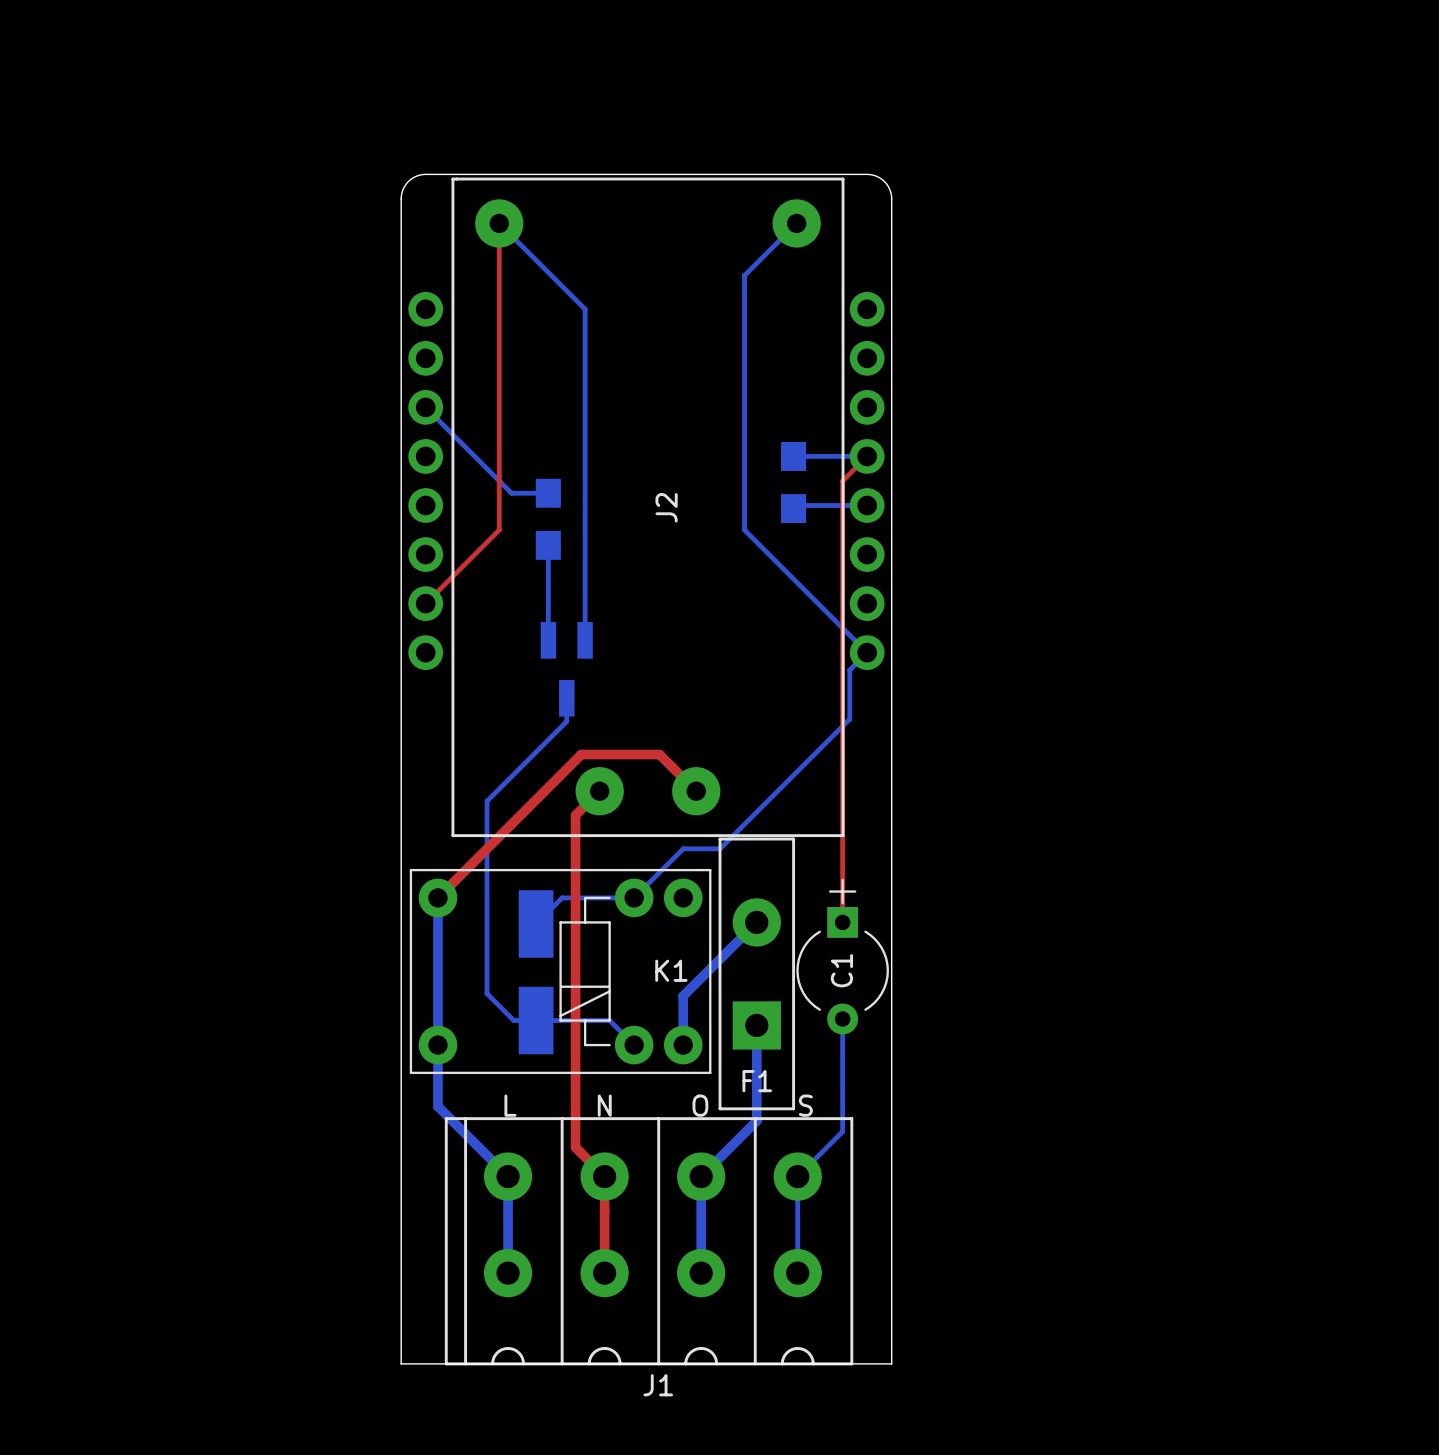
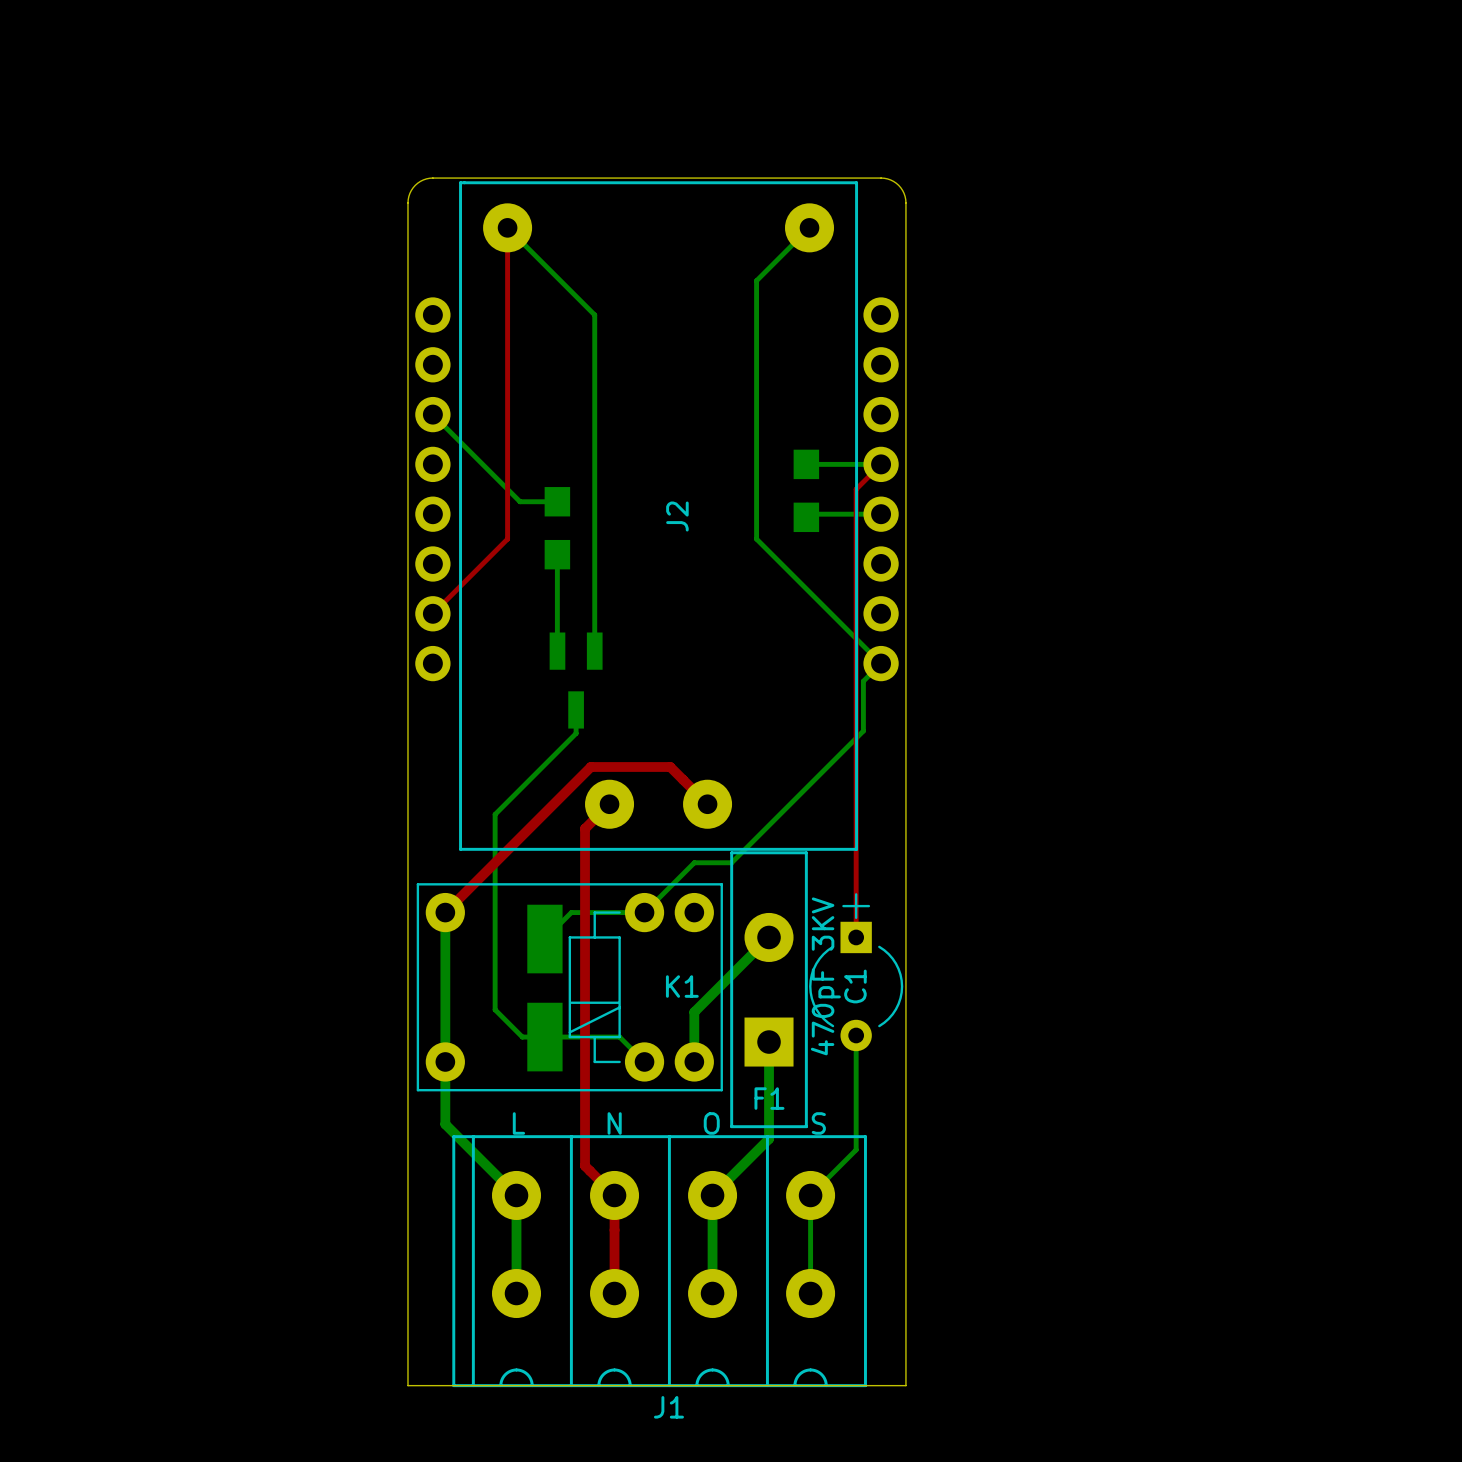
C1 value: none -> 470pF 3KV (825, 976)

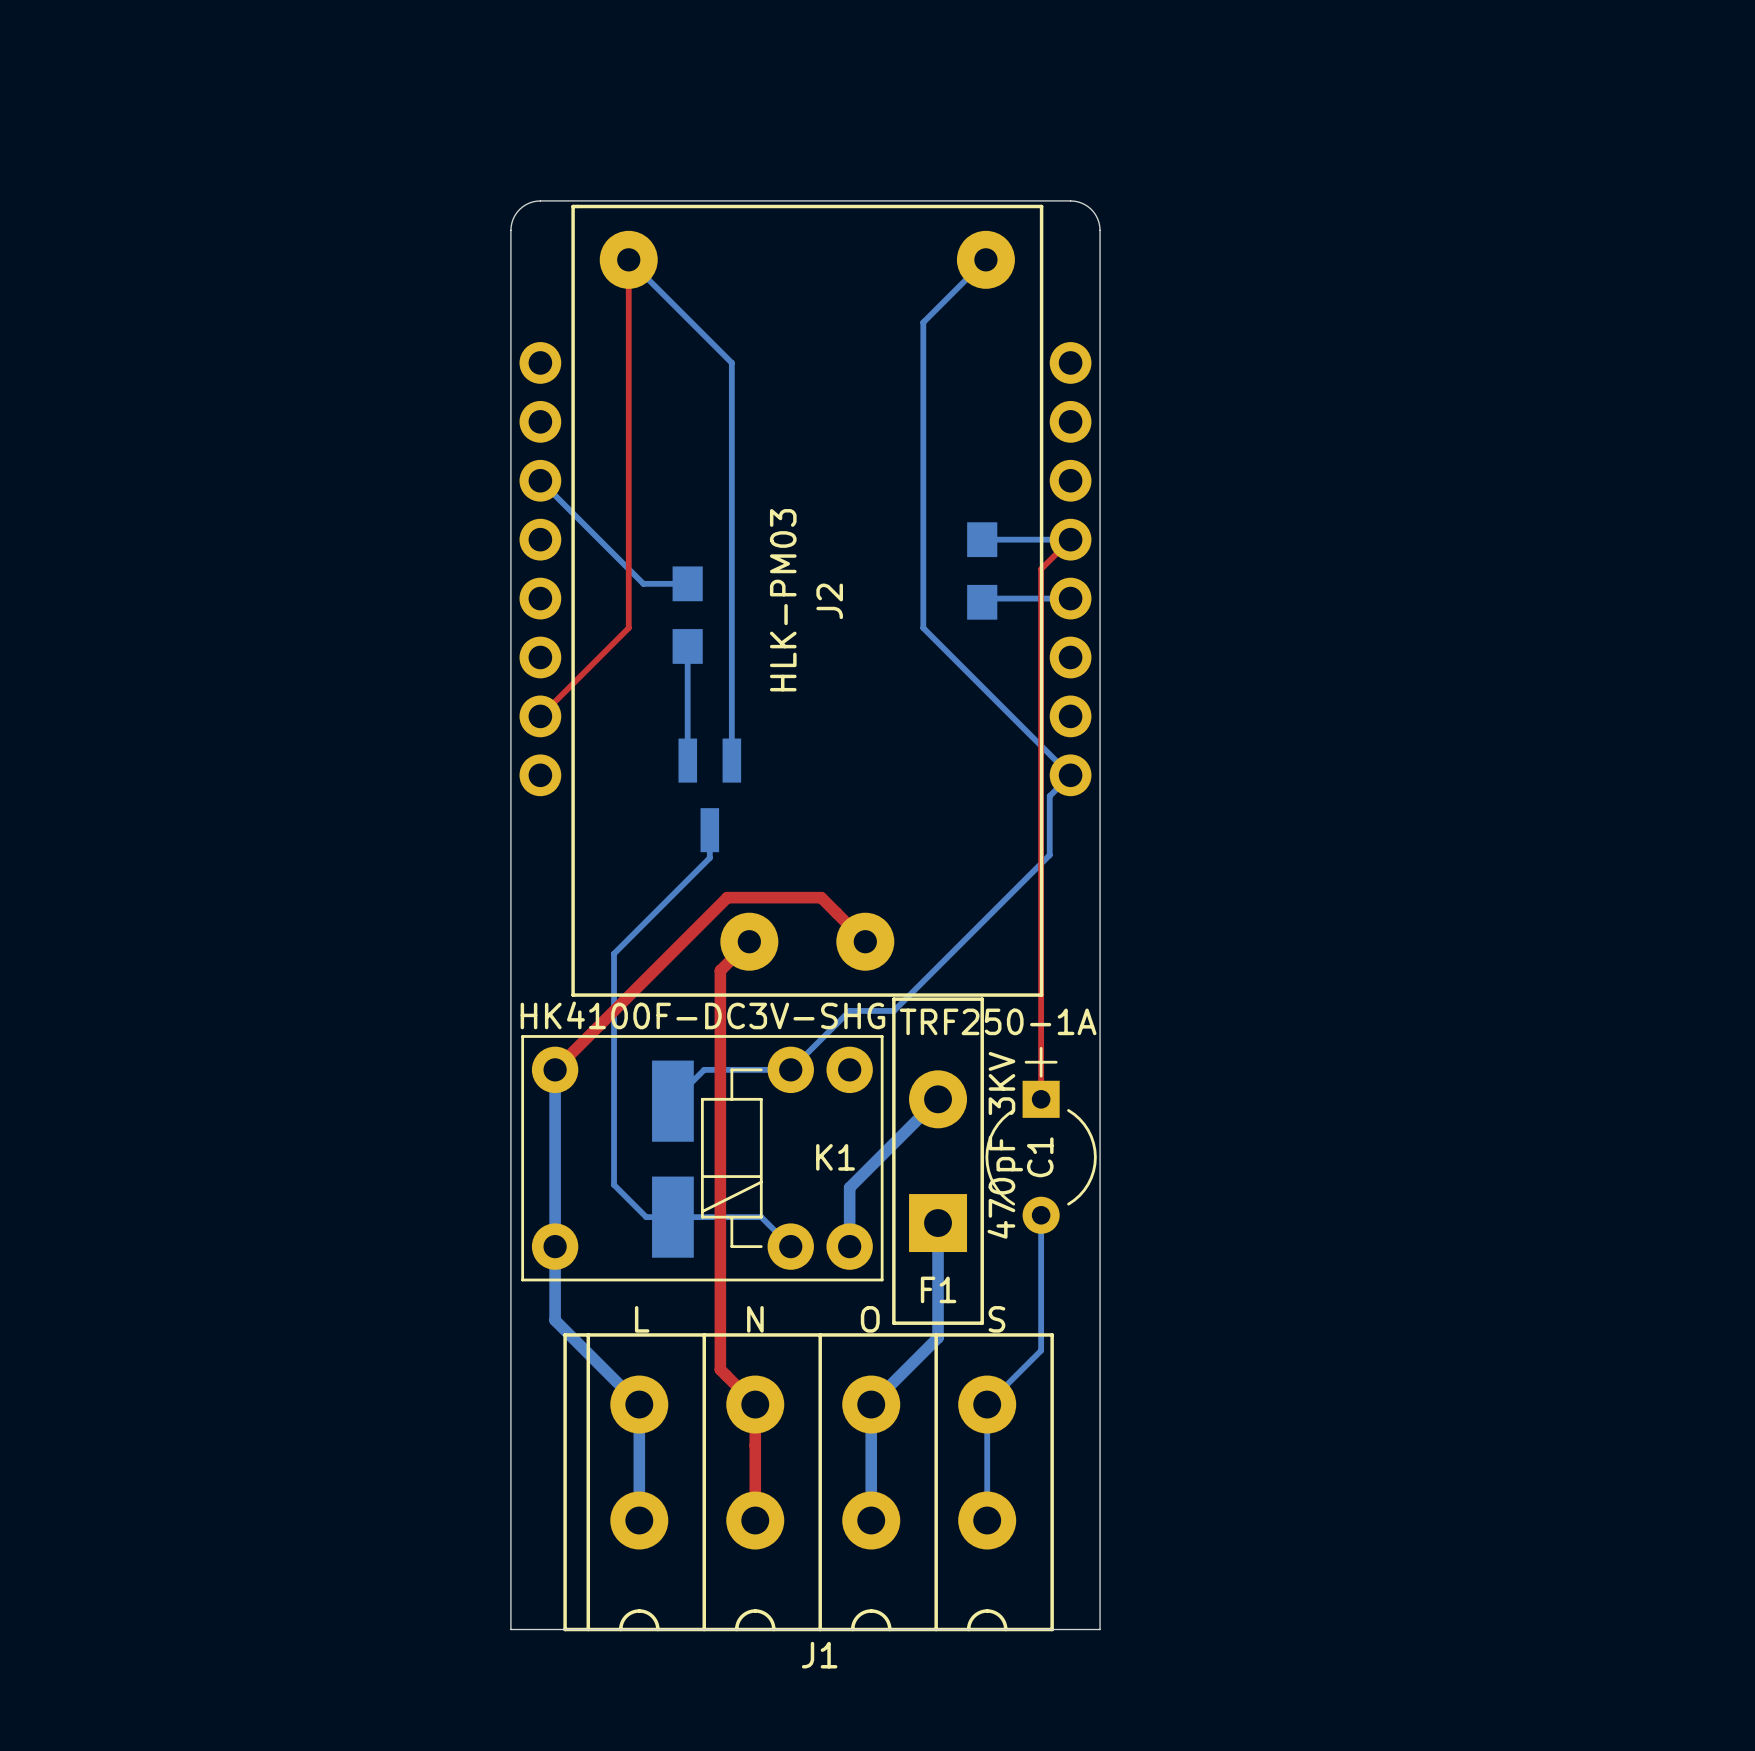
J2 value: none -> HLK-PM03 (783, 600)
K1 value: none -> HK4100F-DC3V-SHG (702, 1015)
F1 value: none -> TRF250-1A (998, 1021)

